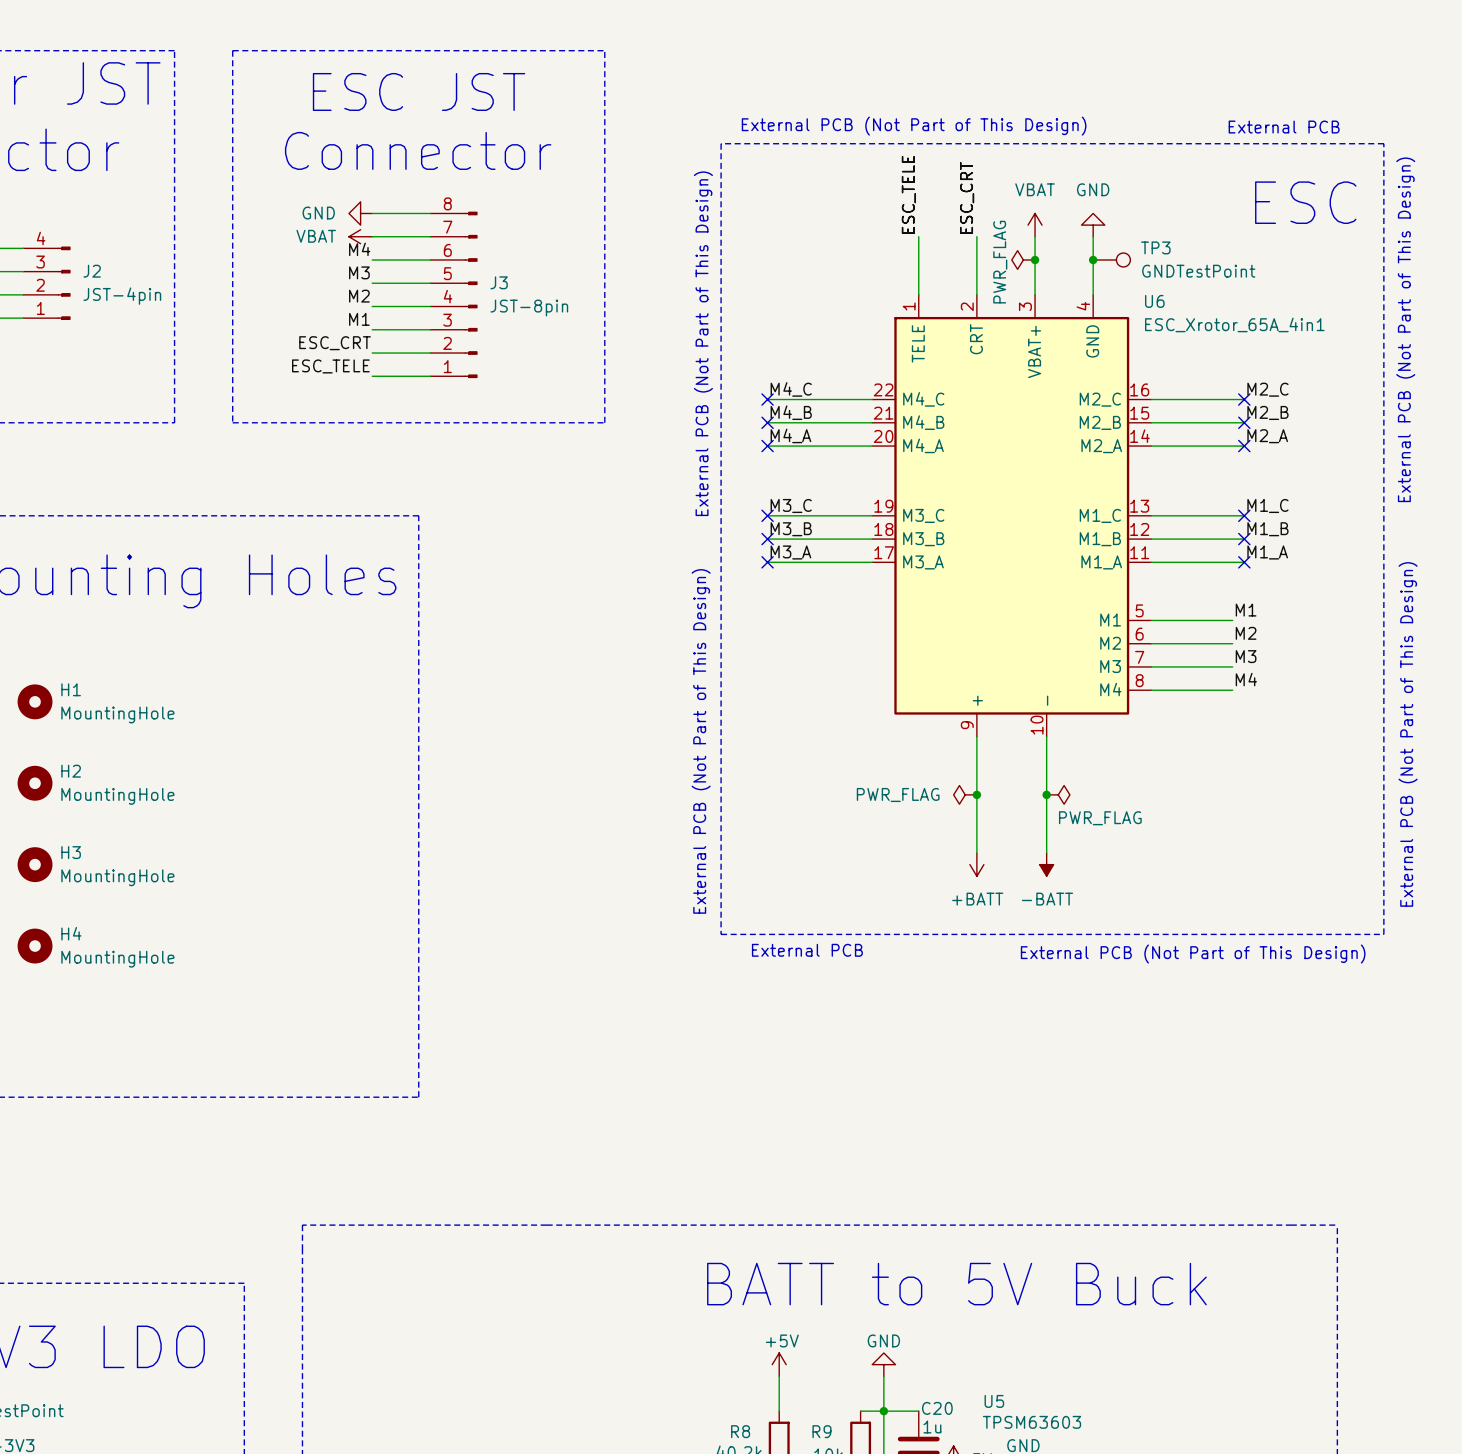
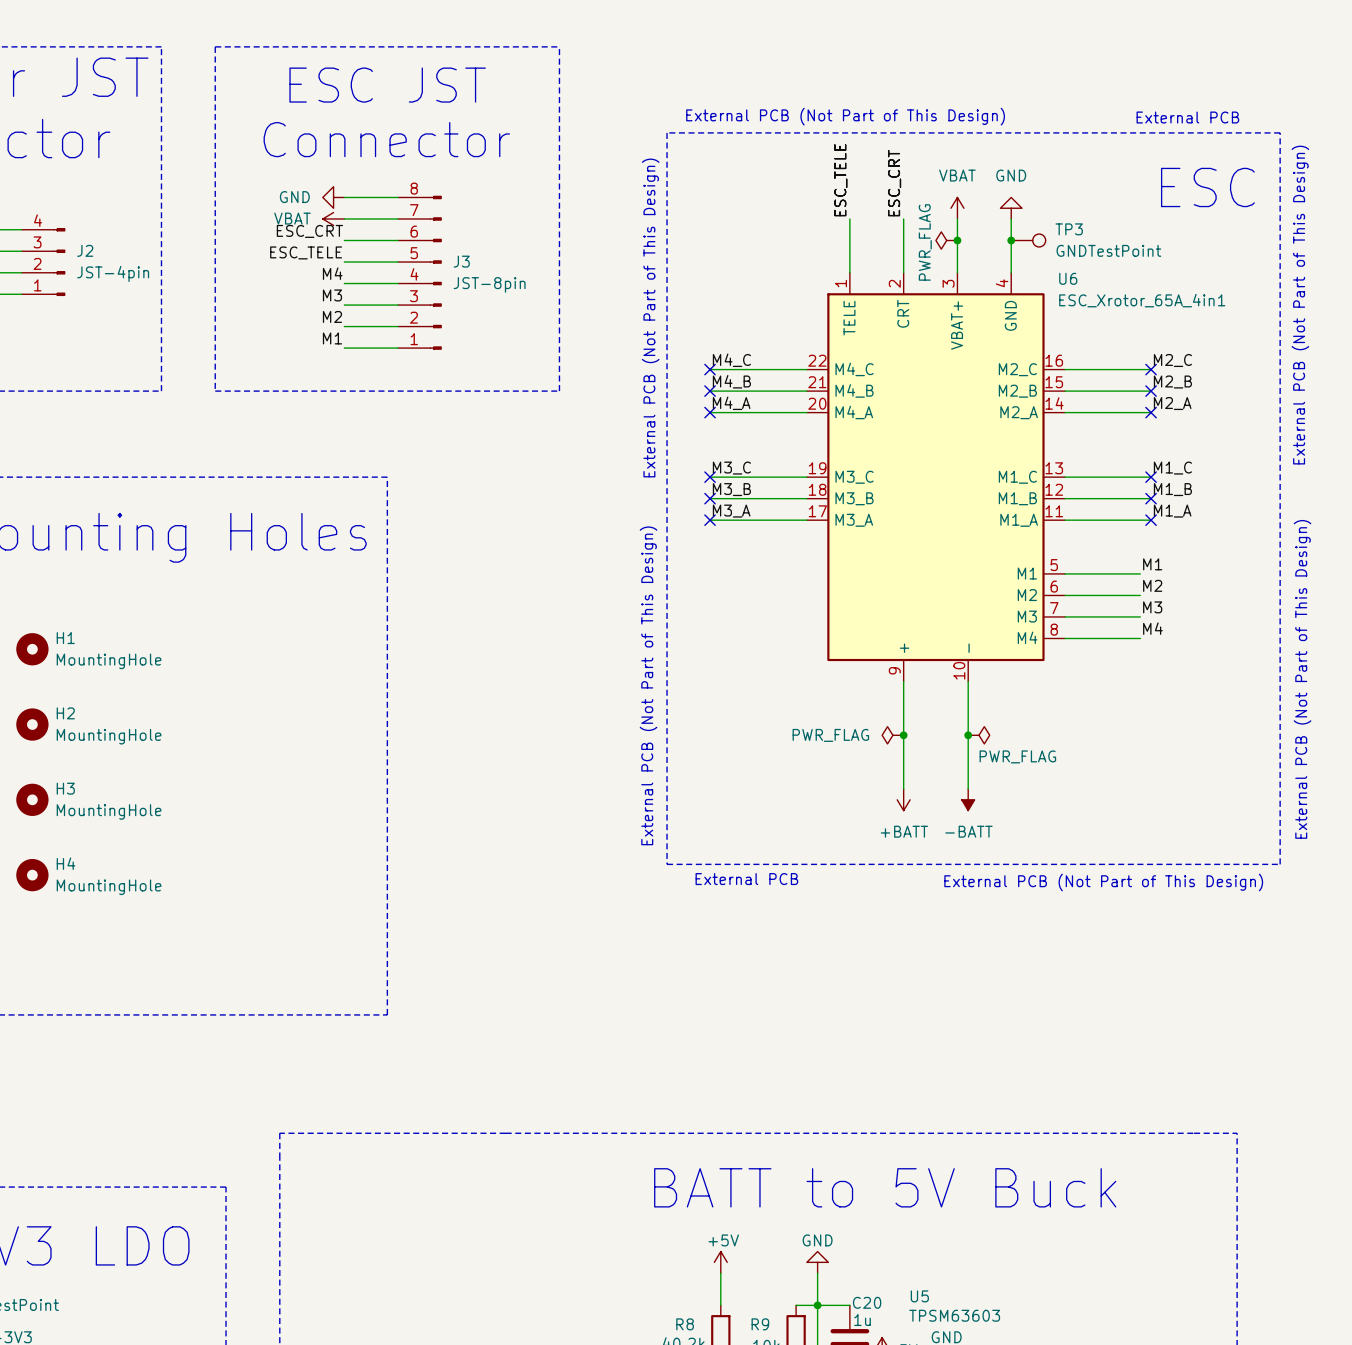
label: M4 (359, 249) -> ESC_CRT (309, 231)
label: M3 (359, 272) -> ESC_TELE (306, 252)
label: M2 (359, 296) -> M4 (332, 273)
label: M1 (359, 319) -> M3 (332, 295)
label: ESC_CRT (335, 343) -> M2 (332, 316)
label: ESC_TELE (330, 366) -> M1 (332, 338)

